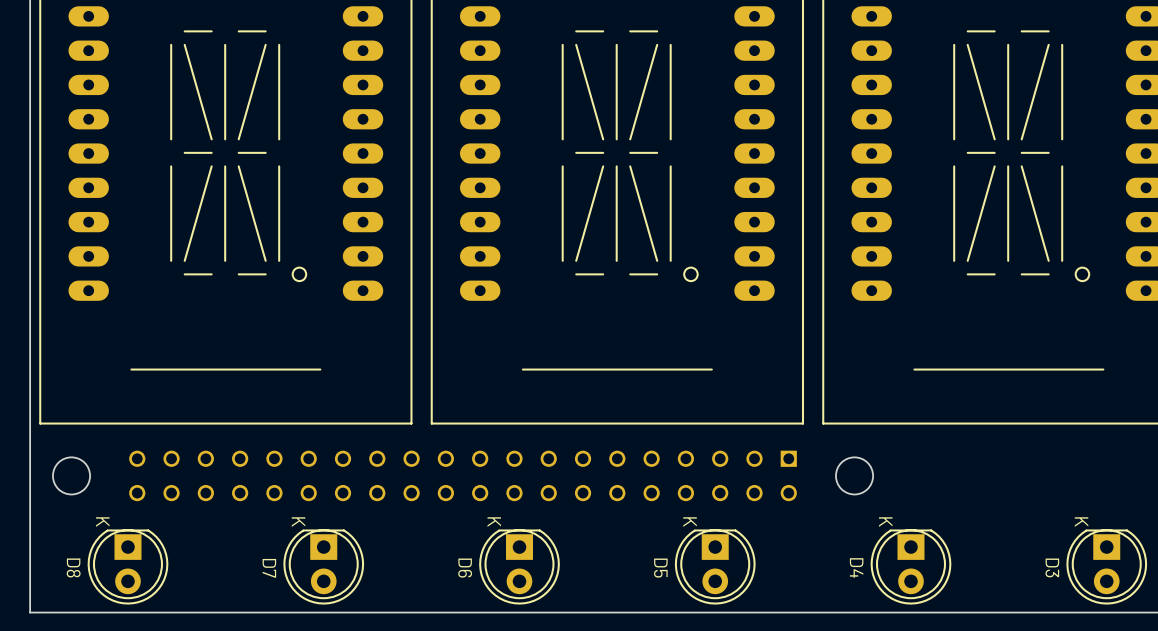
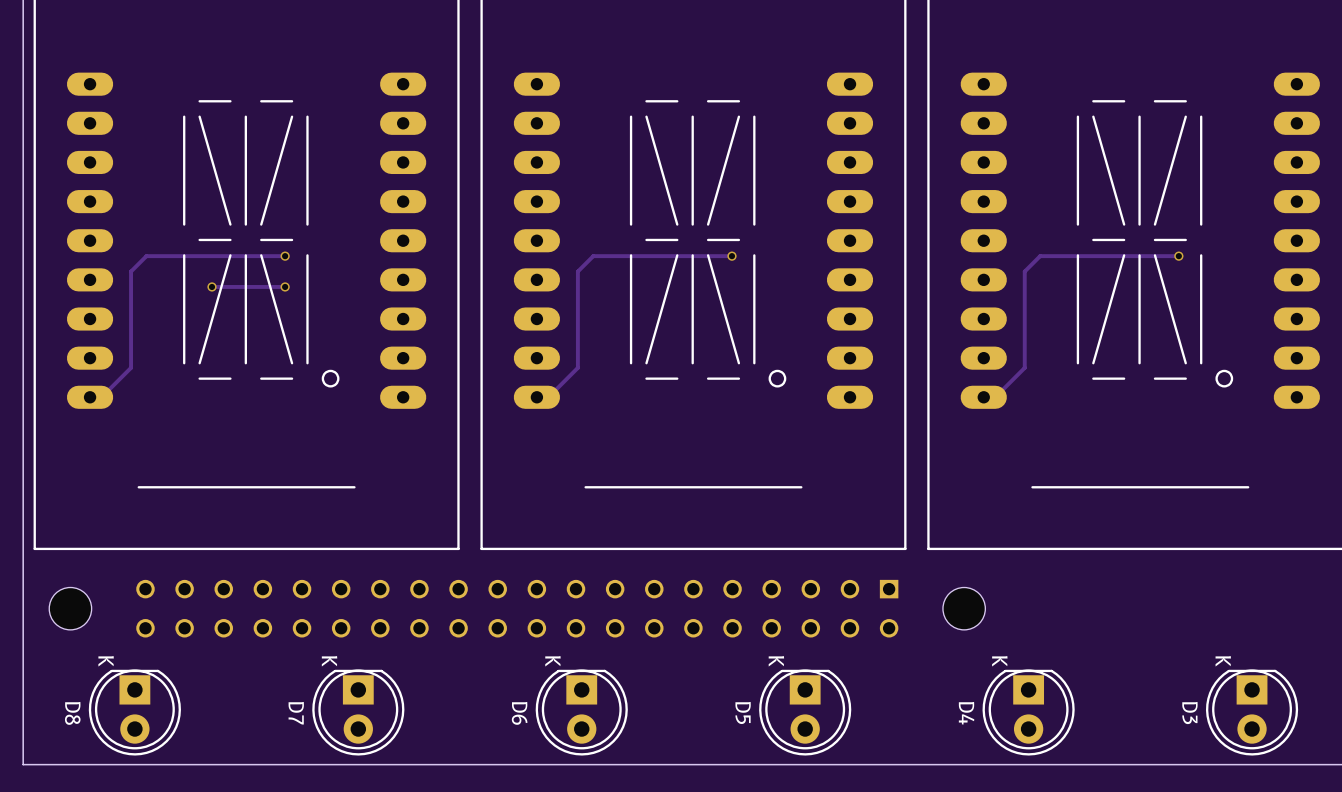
track: none -> (285, 256) (146, 256) (131, 271) (131, 367) (101, 397) (90, 397)
via: none -> (285, 256)
track: none -> (731, 256) (593, 256) (577, 271) (577, 367) (548, 397) (536, 397)
via: none -> (731, 256)
track: none -> (1178, 256) (1040, 256) (1024, 271) (1024, 367) (995, 397) (983, 397)
via: none -> (1178, 256)
via: none -> (212, 286)
track: none -> (285, 286) (212, 286)
via: none -> (285, 286)

